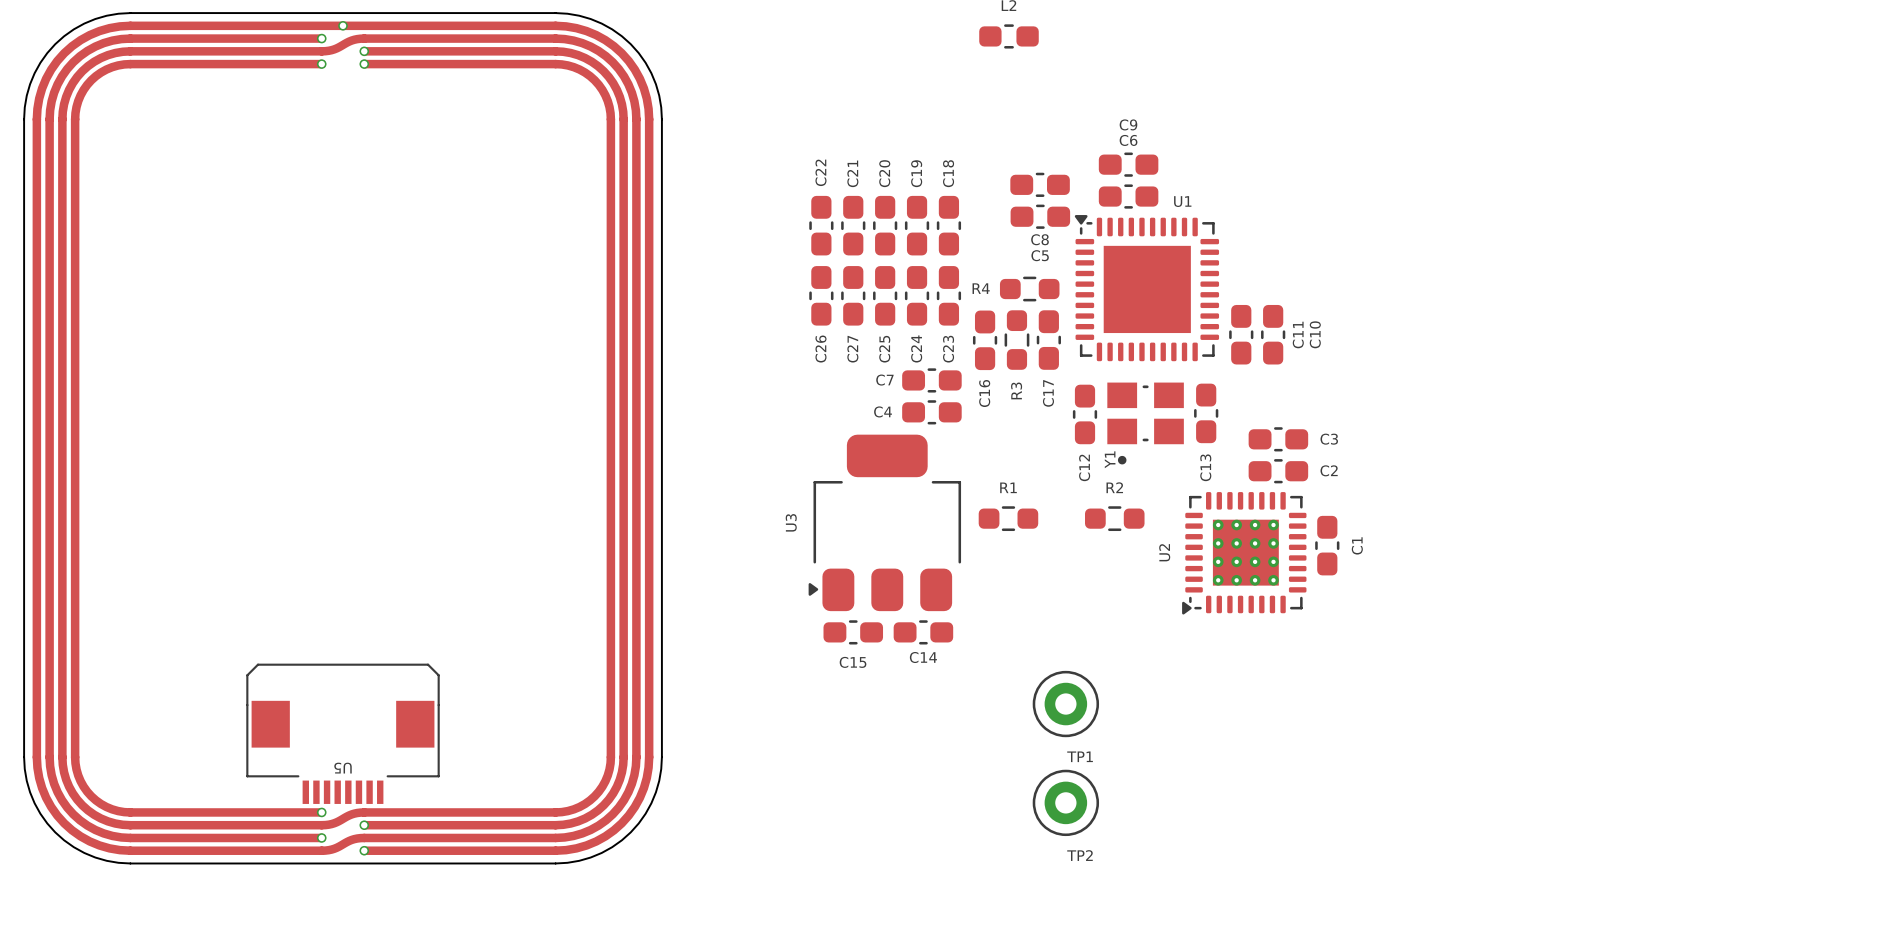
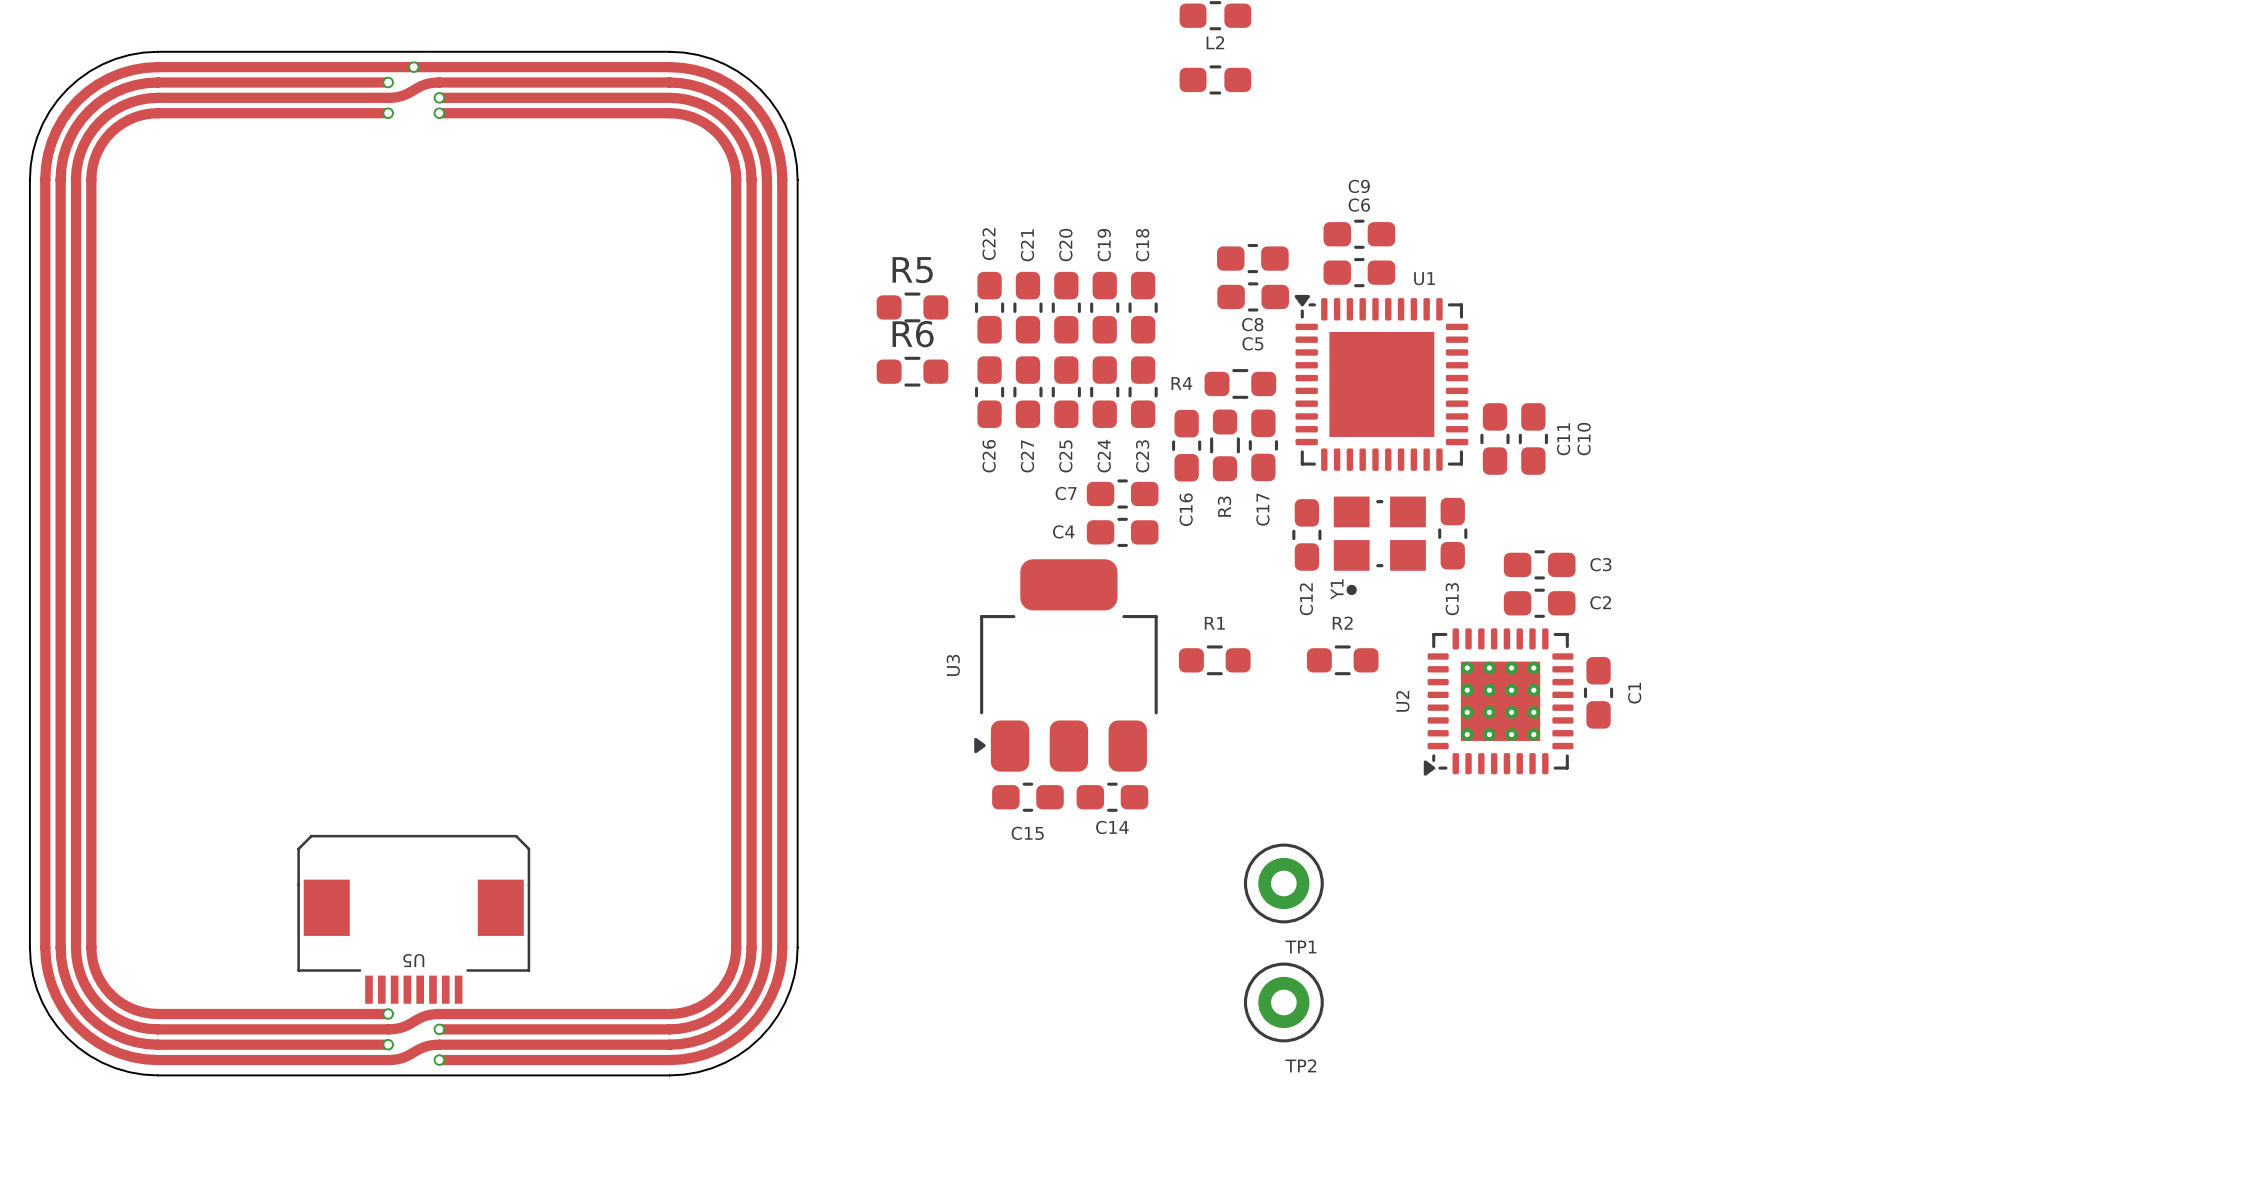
R5: none -> (912, 307)
R6: none -> (912, 371)

